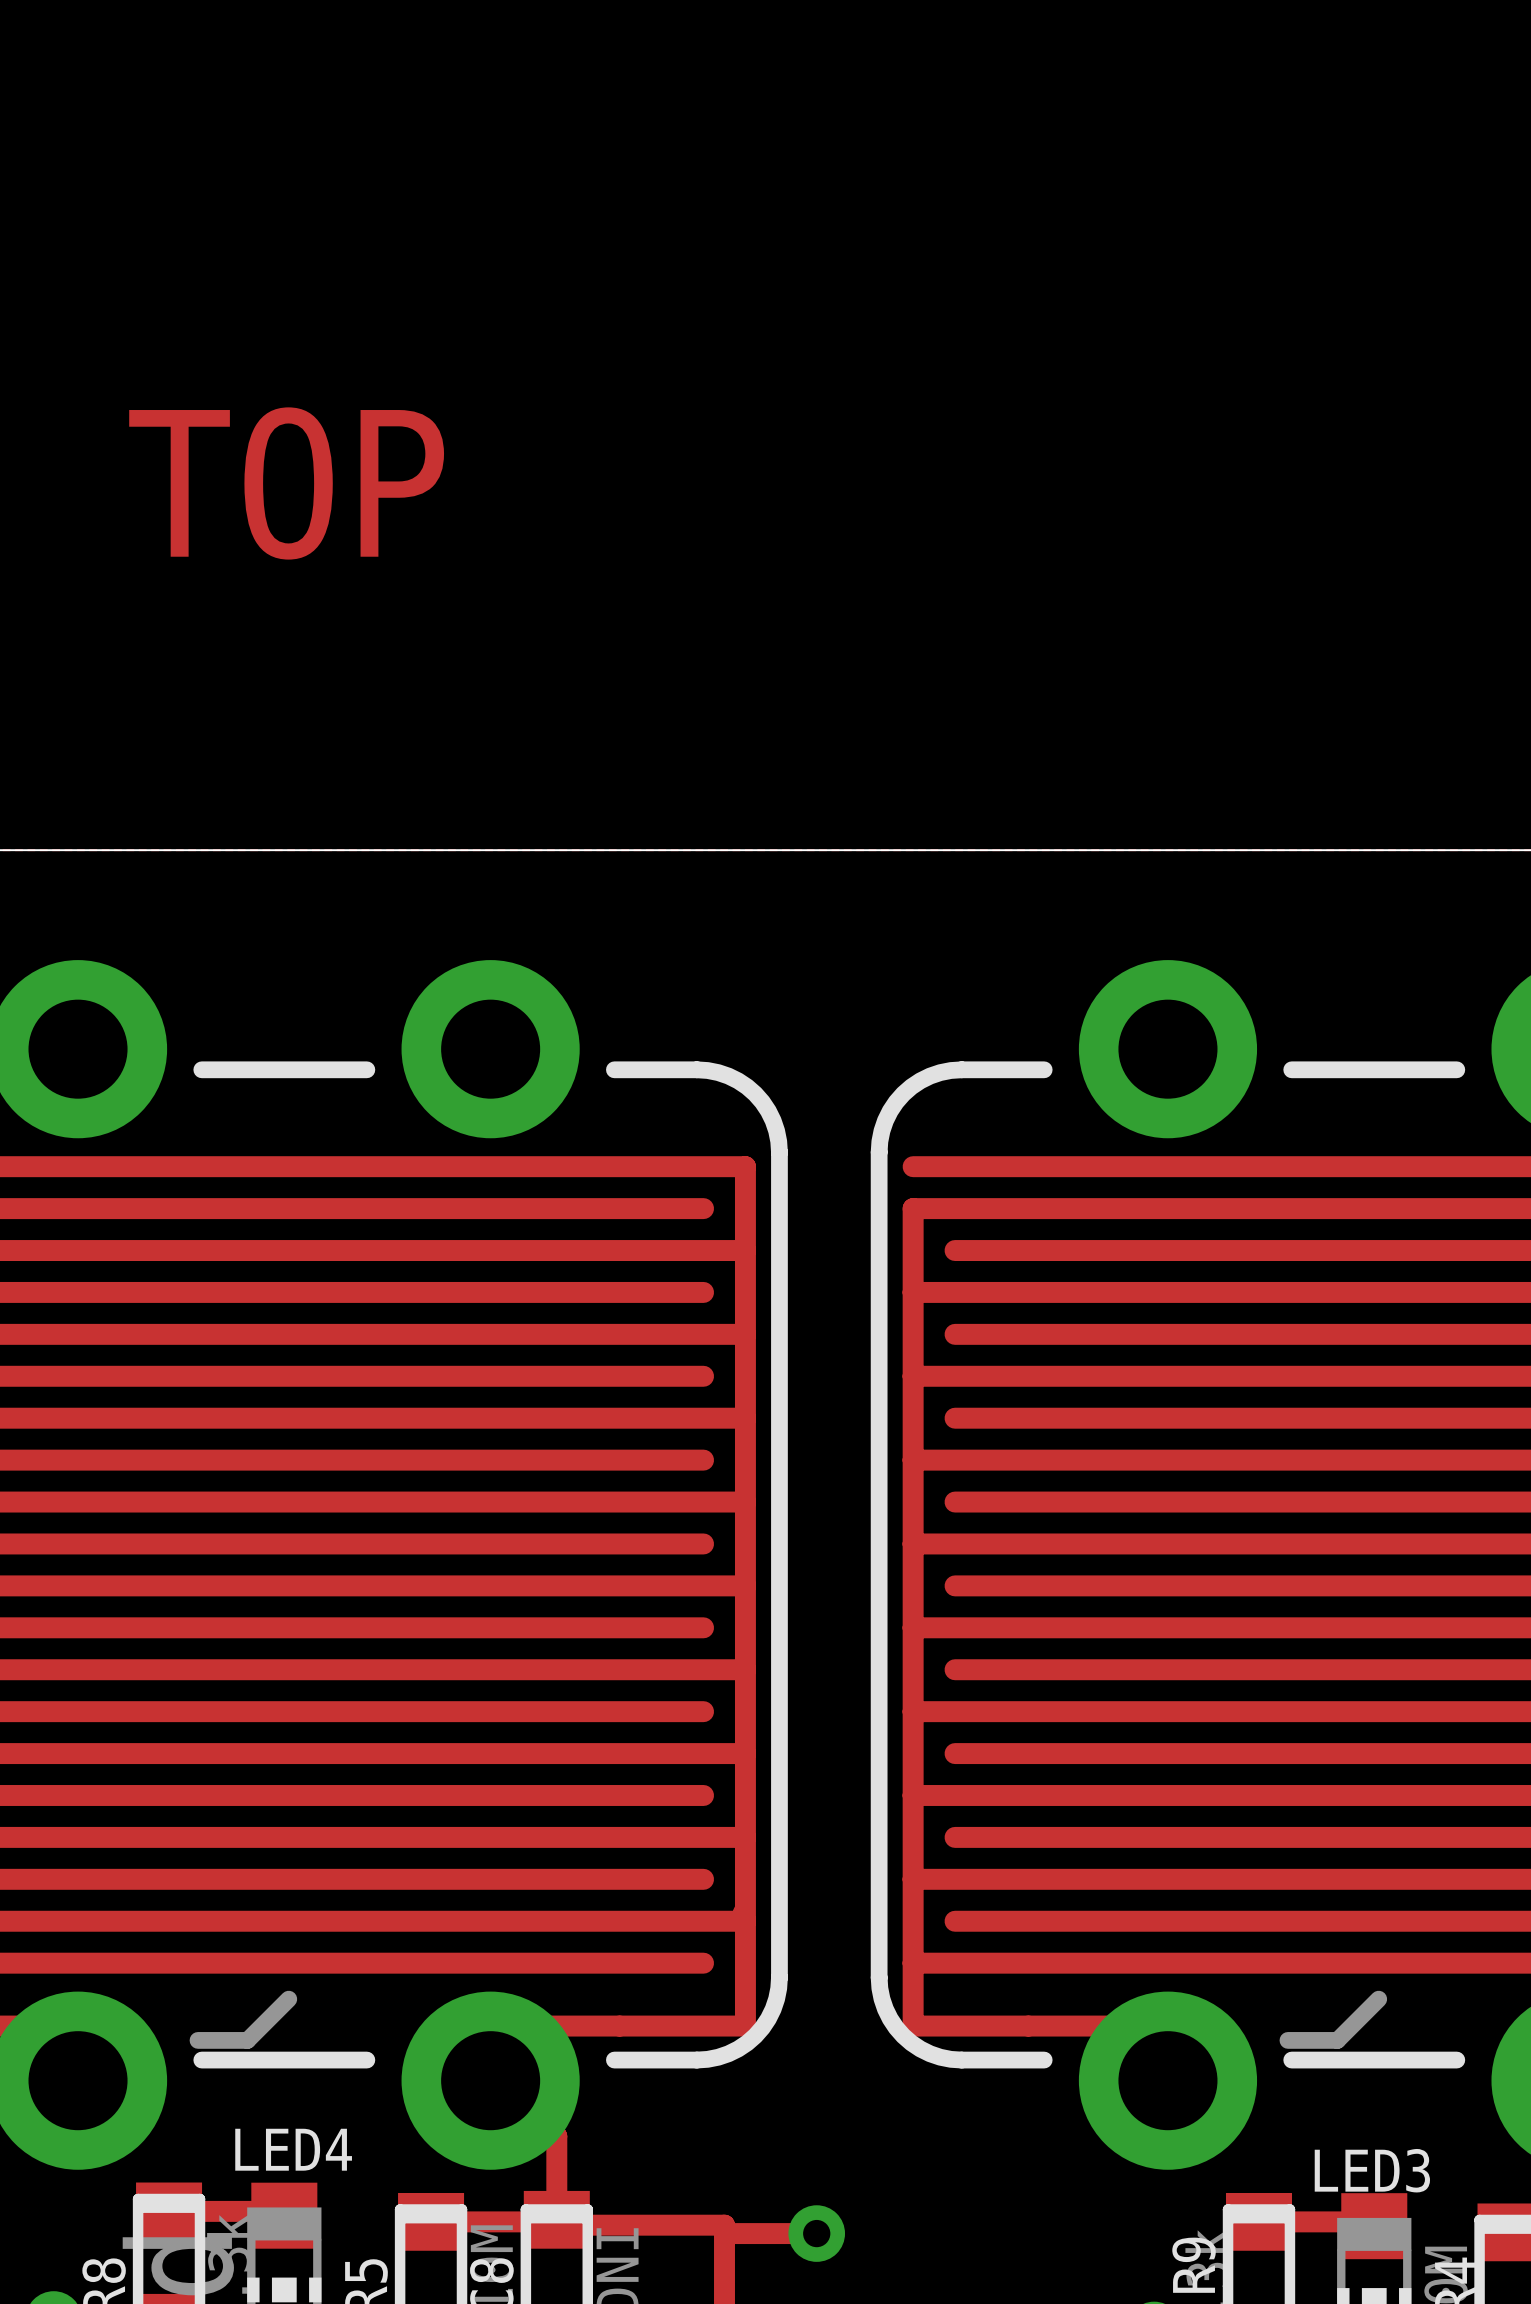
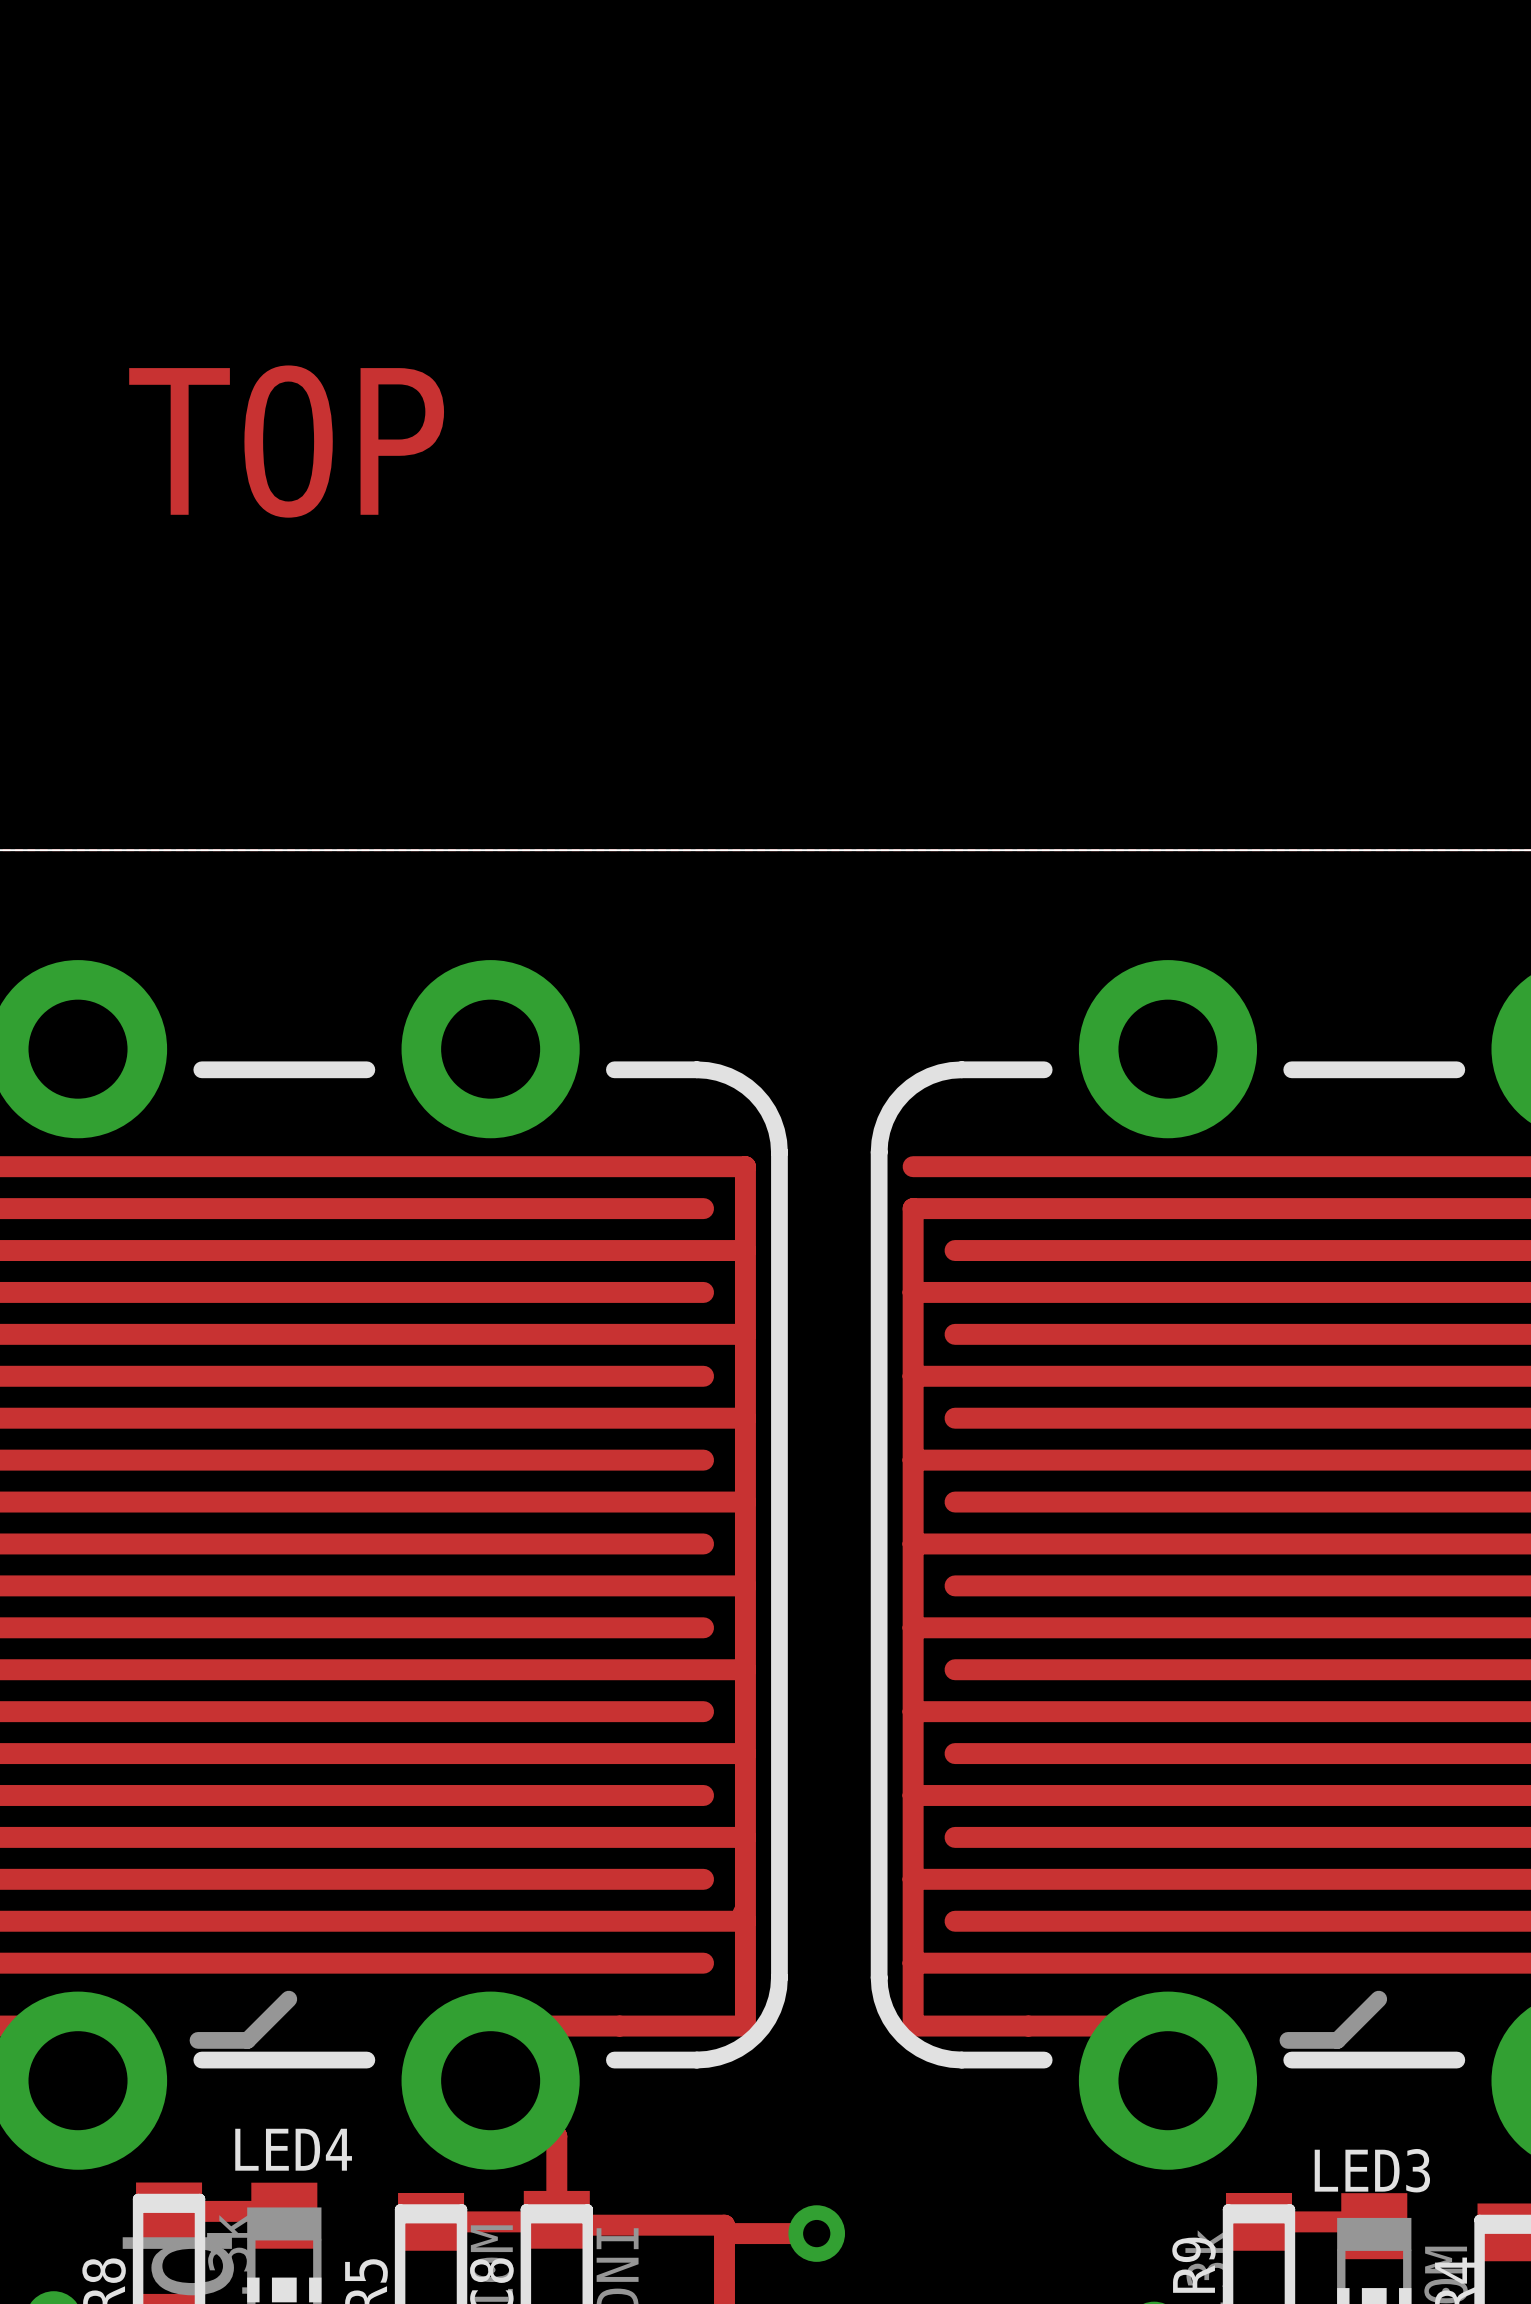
text position: TOP (286, 483) -> TOP (286, 441)

